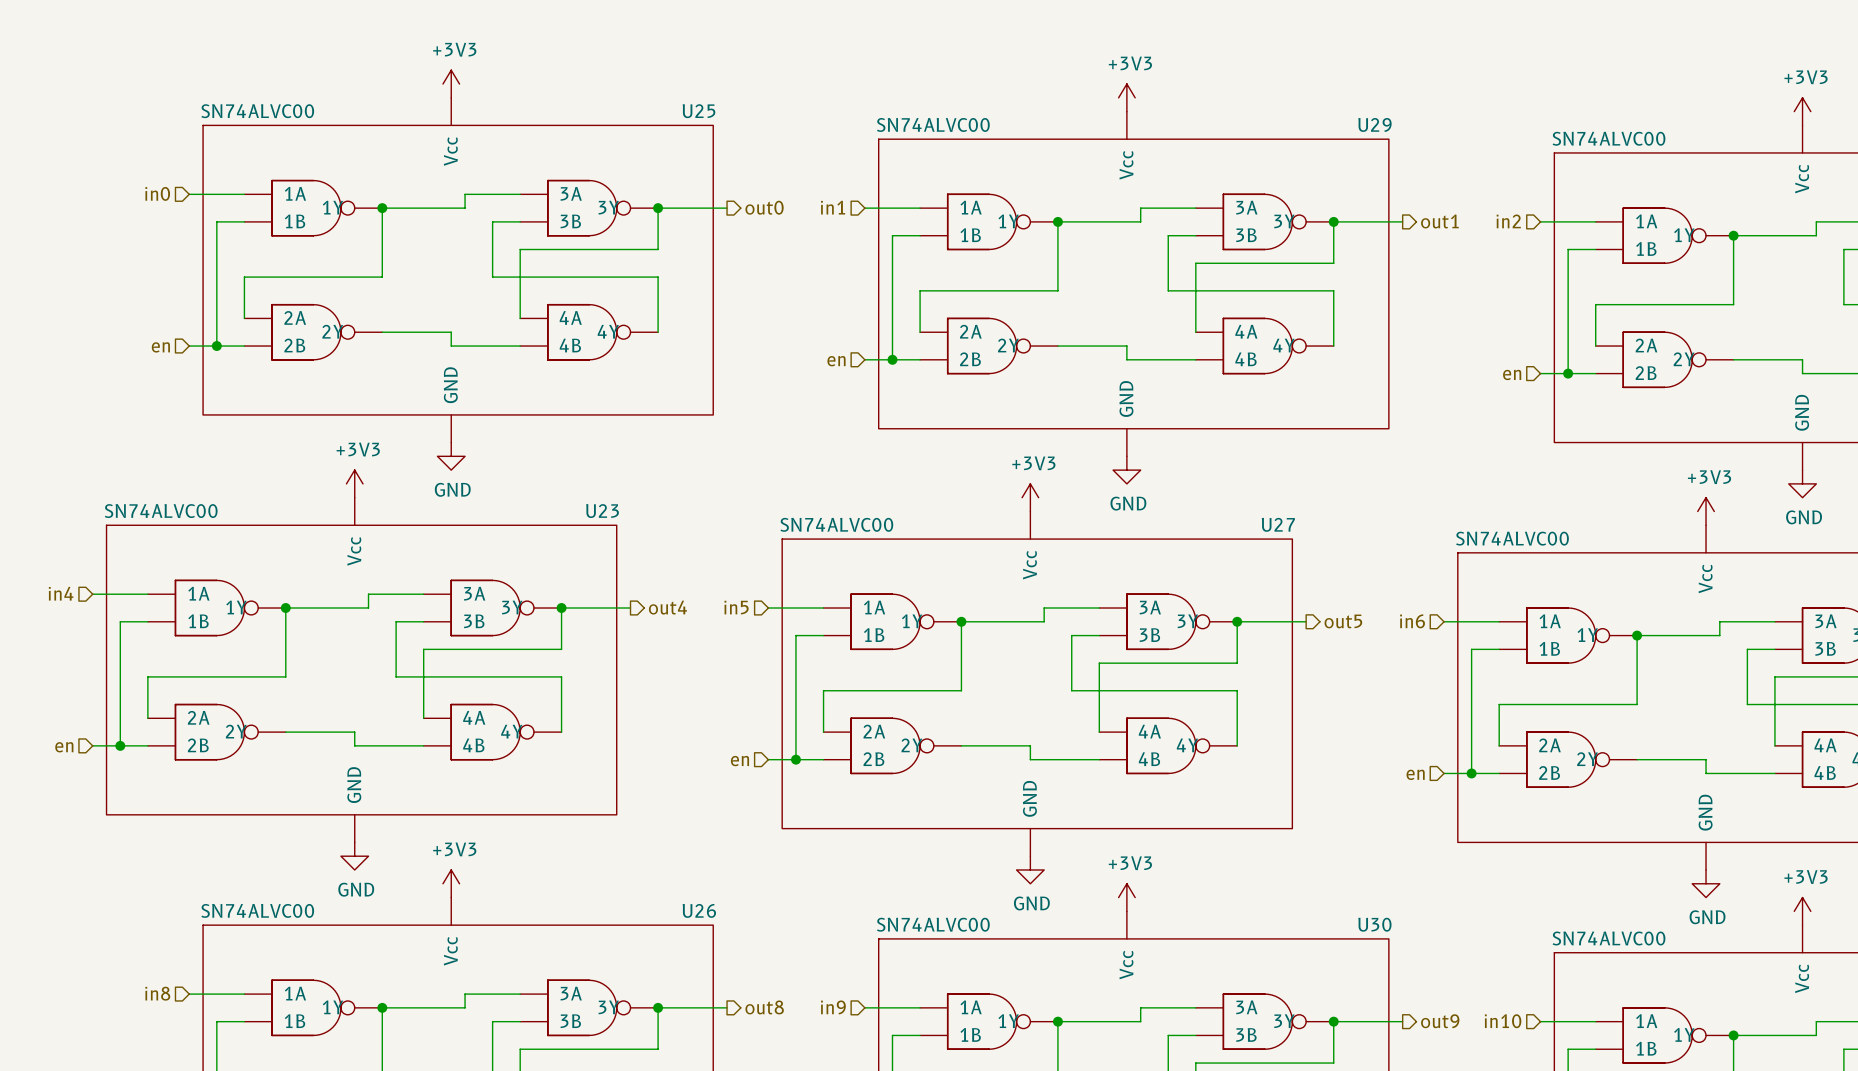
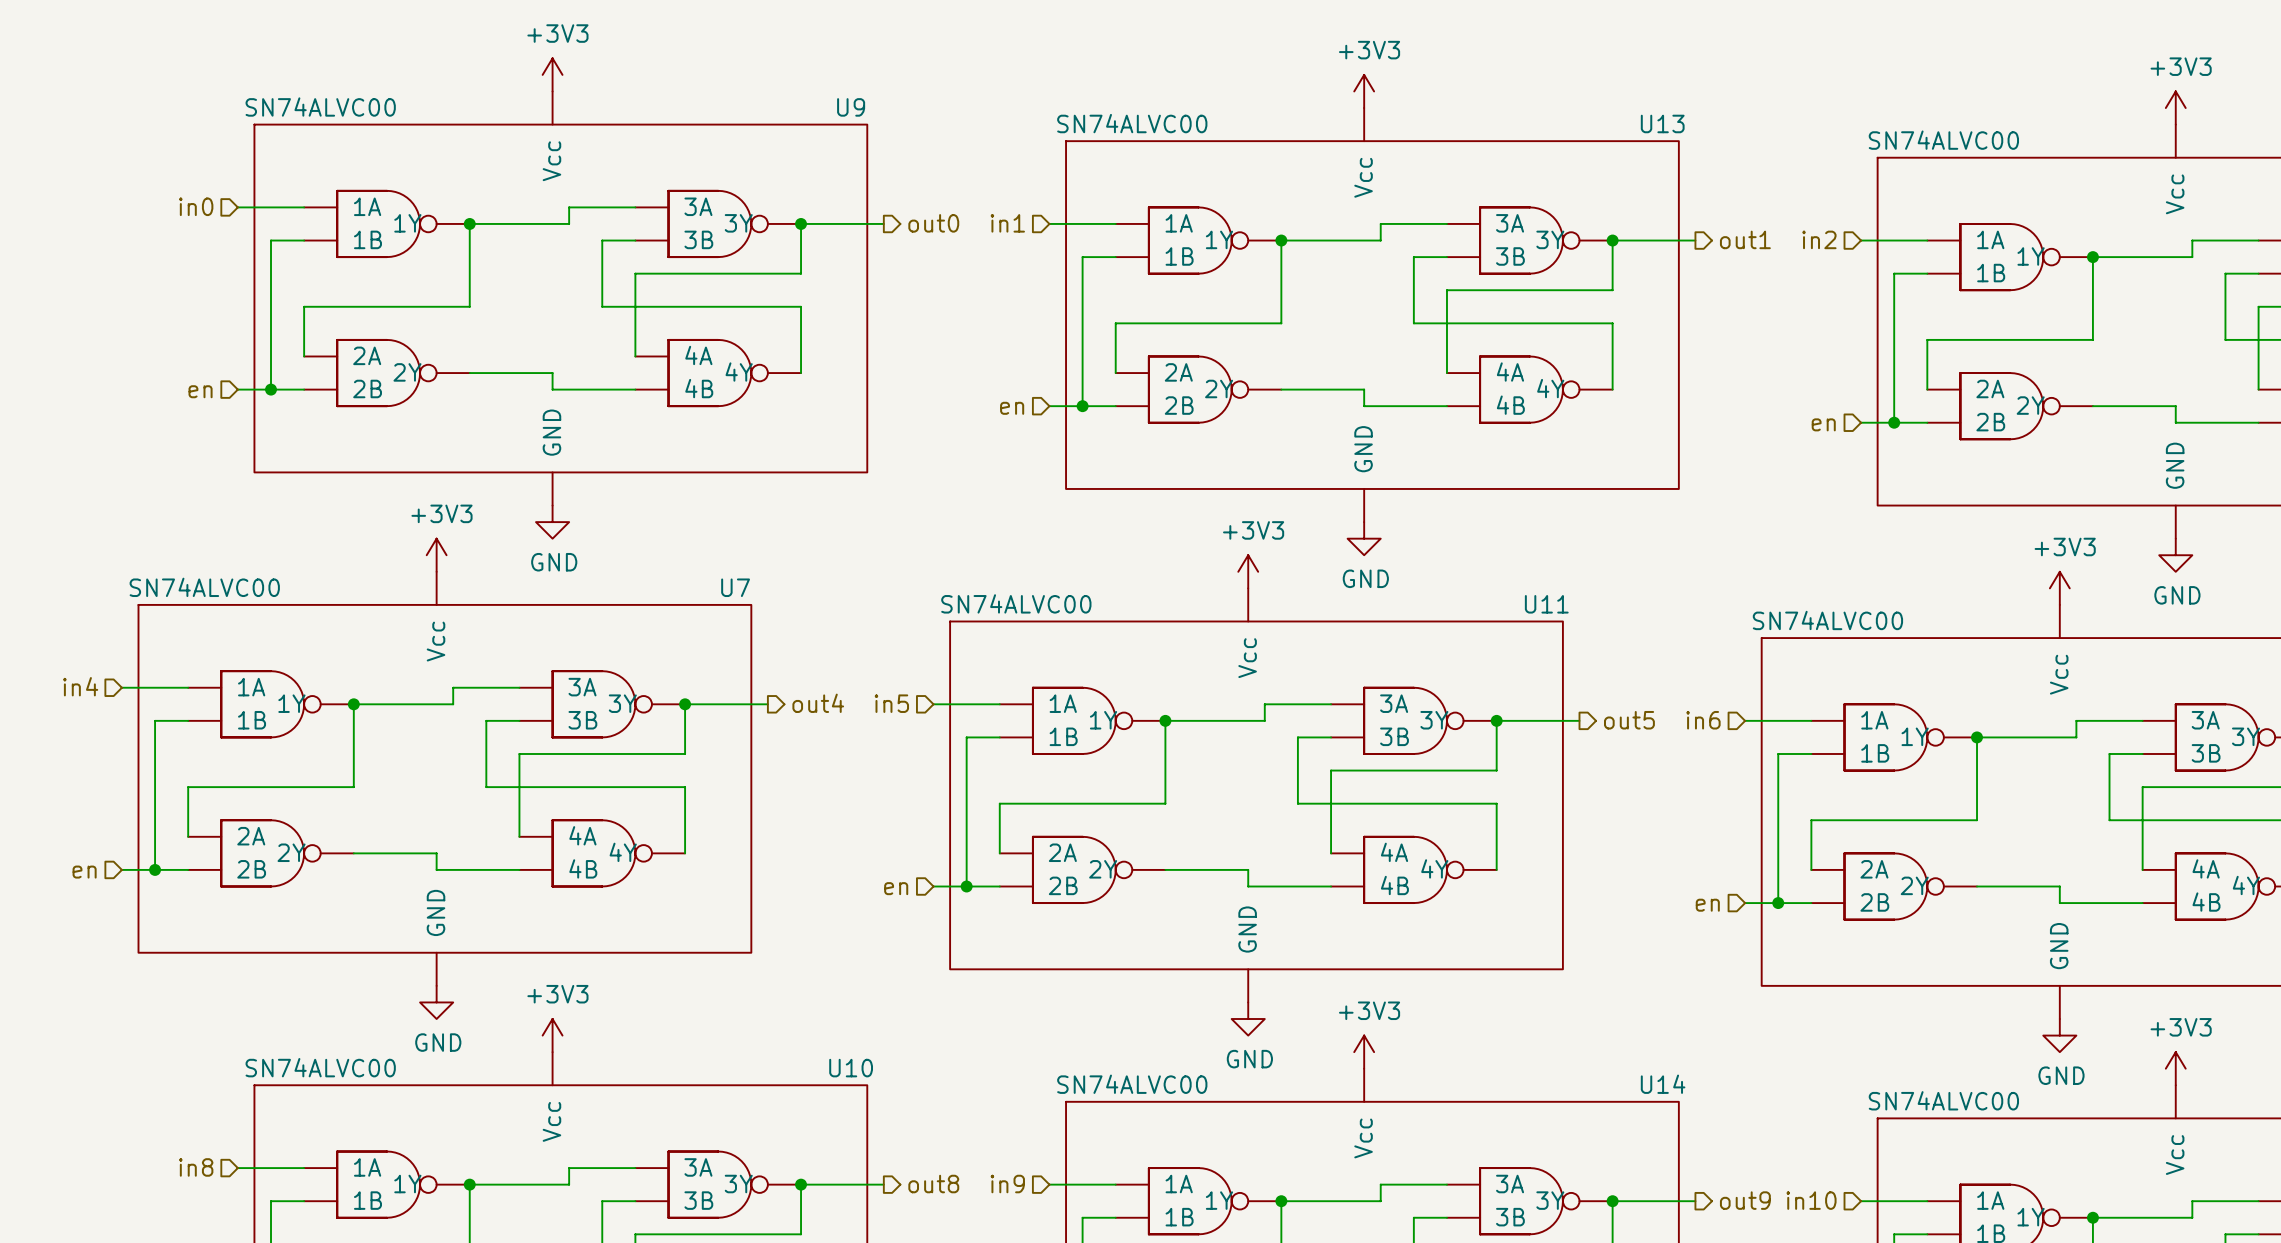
U25 name: U25 (698, 111) -> U9 (851, 107)
U29 name: U29 (1374, 124) -> U13 (1662, 123)
U23 name: U23 (602, 511) -> U7 (735, 587)
U27 name: U27 (1278, 524) -> U11 (1546, 604)
U26 name: U26 (699, 910) -> U10 (851, 1068)
U30 name: U30 (1374, 924) -> U14 (1663, 1084)

